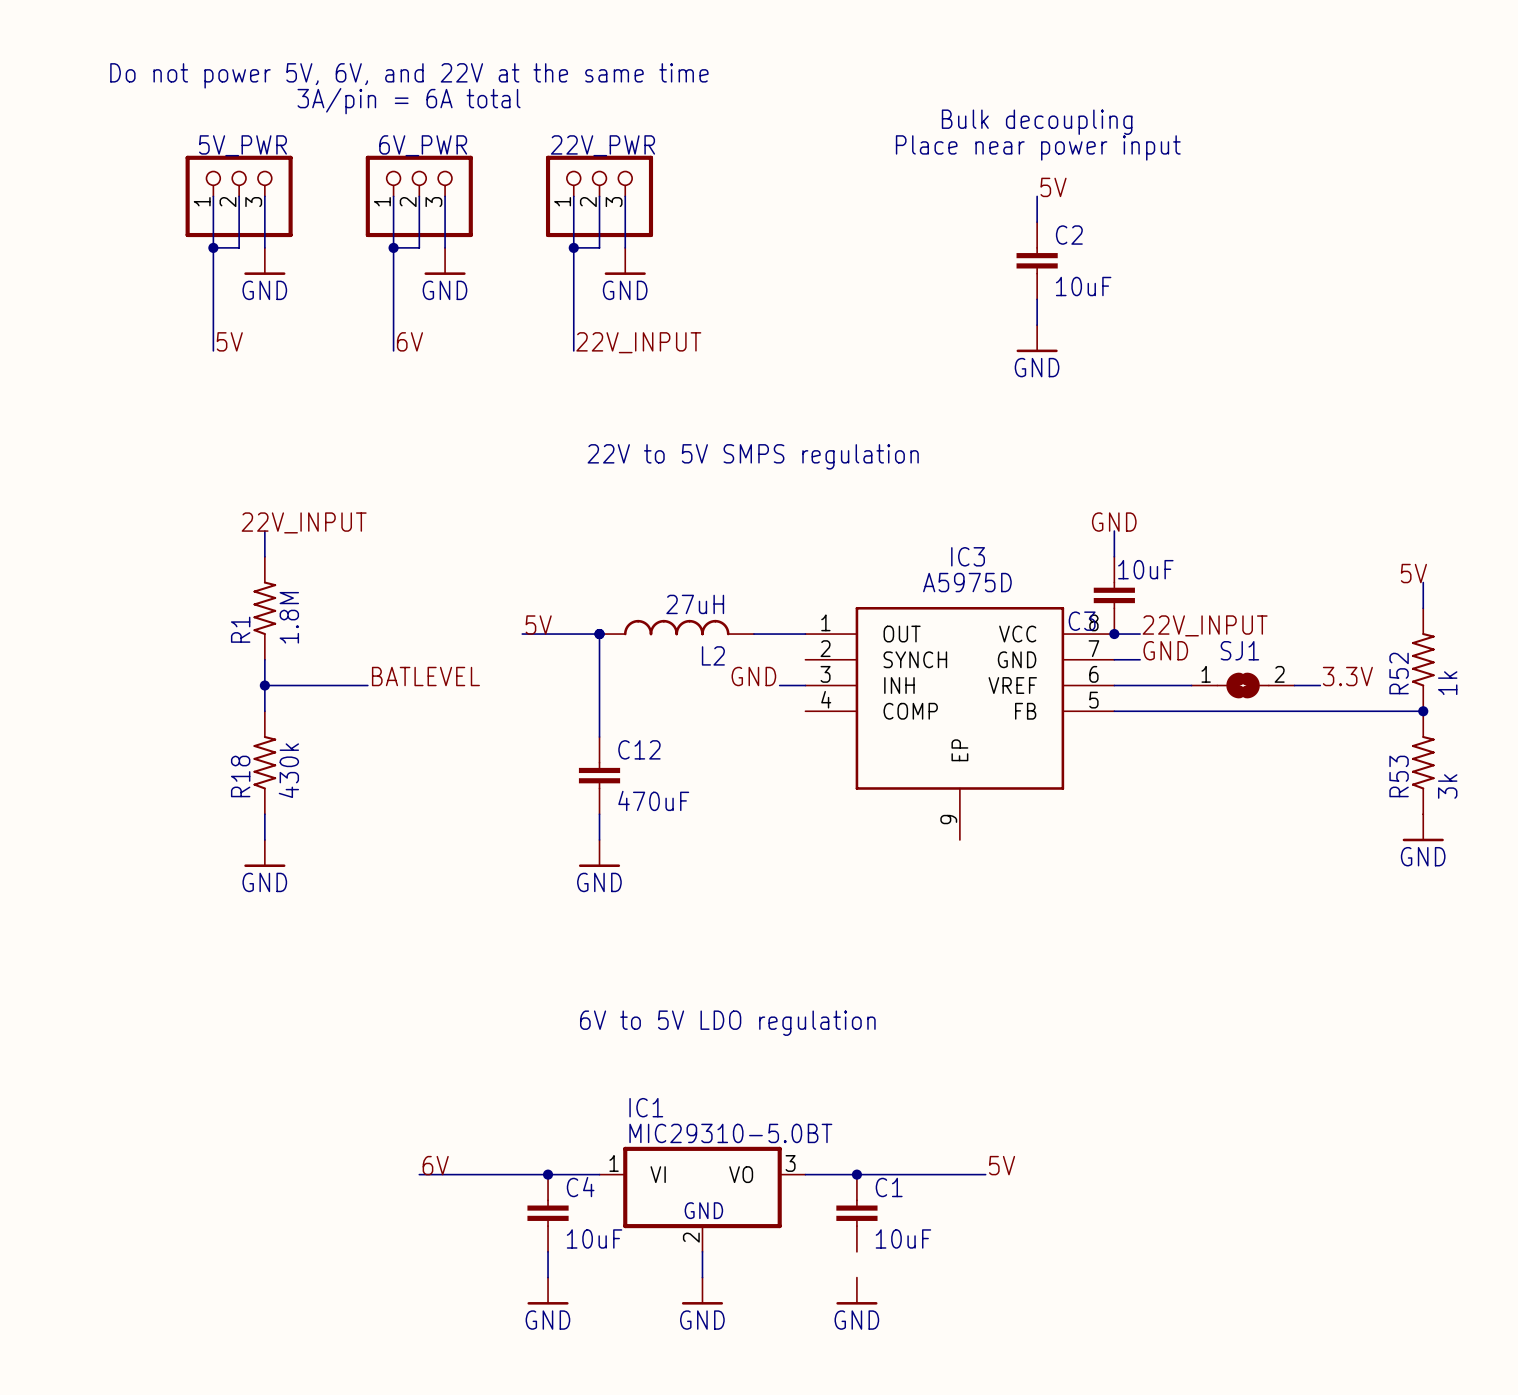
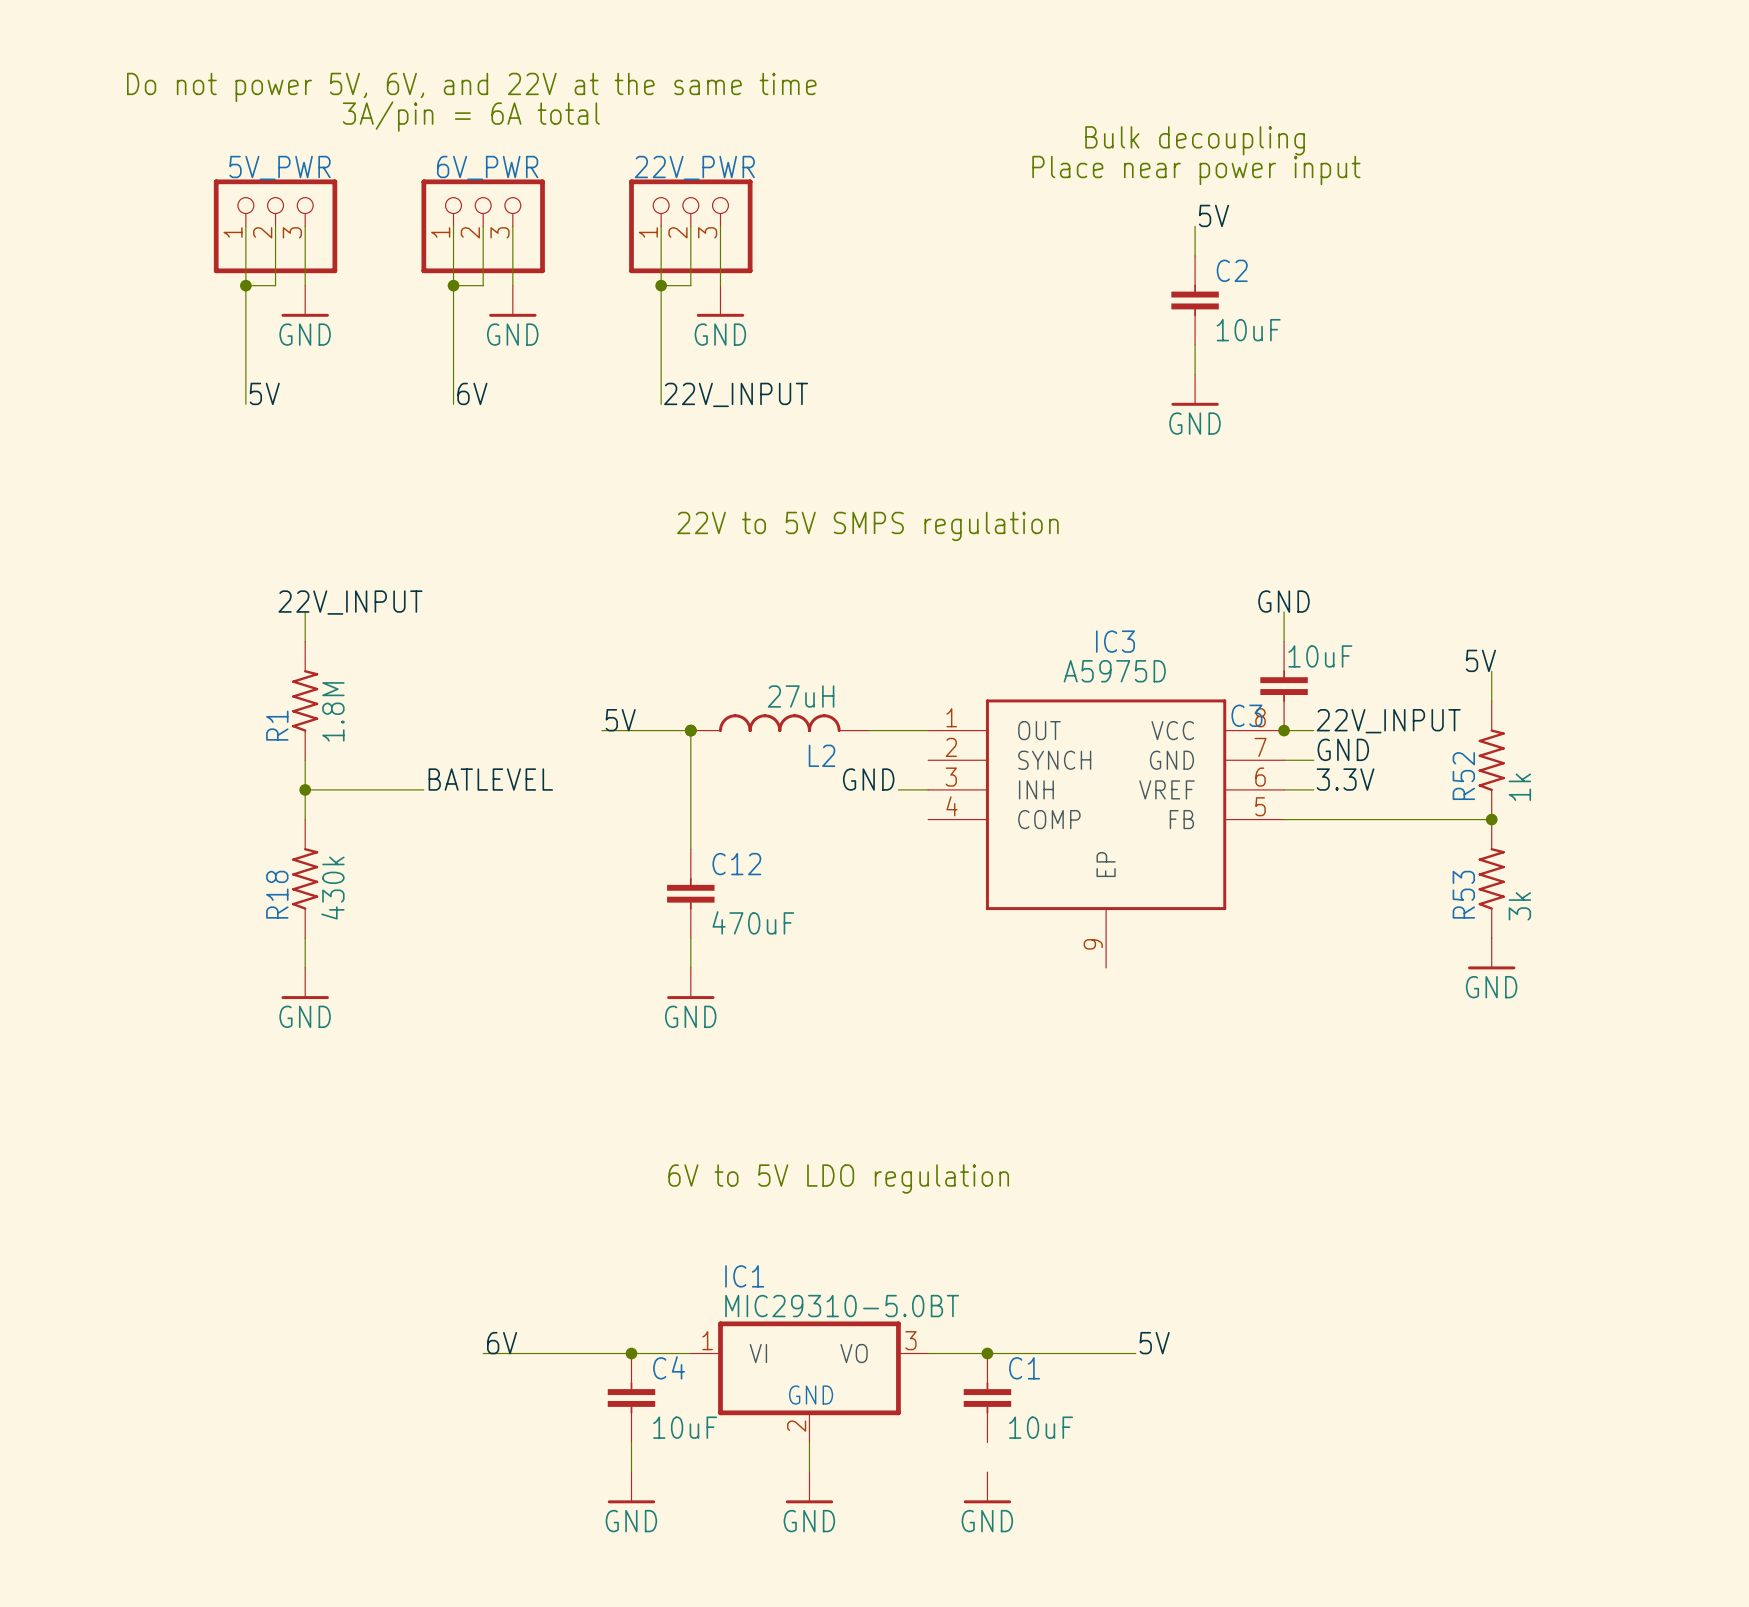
label position: 5V (1413, 573) -> 5V (1480, 660)
wire: (1423, 582) (1423, 608) -> (1491, 671) (1491, 700)
R52 position: (1423, 659) -> (1491, 760)
label position: 3.3V (1347, 676) -> 3.3V (1345, 779)
wire: (1140, 685) (1191, 685) -> none
SJ1: (1243, 685) -> none
wire: (1294, 685) (1320, 685) -> none
wire: (1294, 711) (1423, 711) -> none
junction: none -> (1491, 819)
junction: (1423, 711) -> none
R53 position: (1423, 762) -> (1491, 878)
power symbol position: GND (1423, 827) -> GND (1491, 953)

